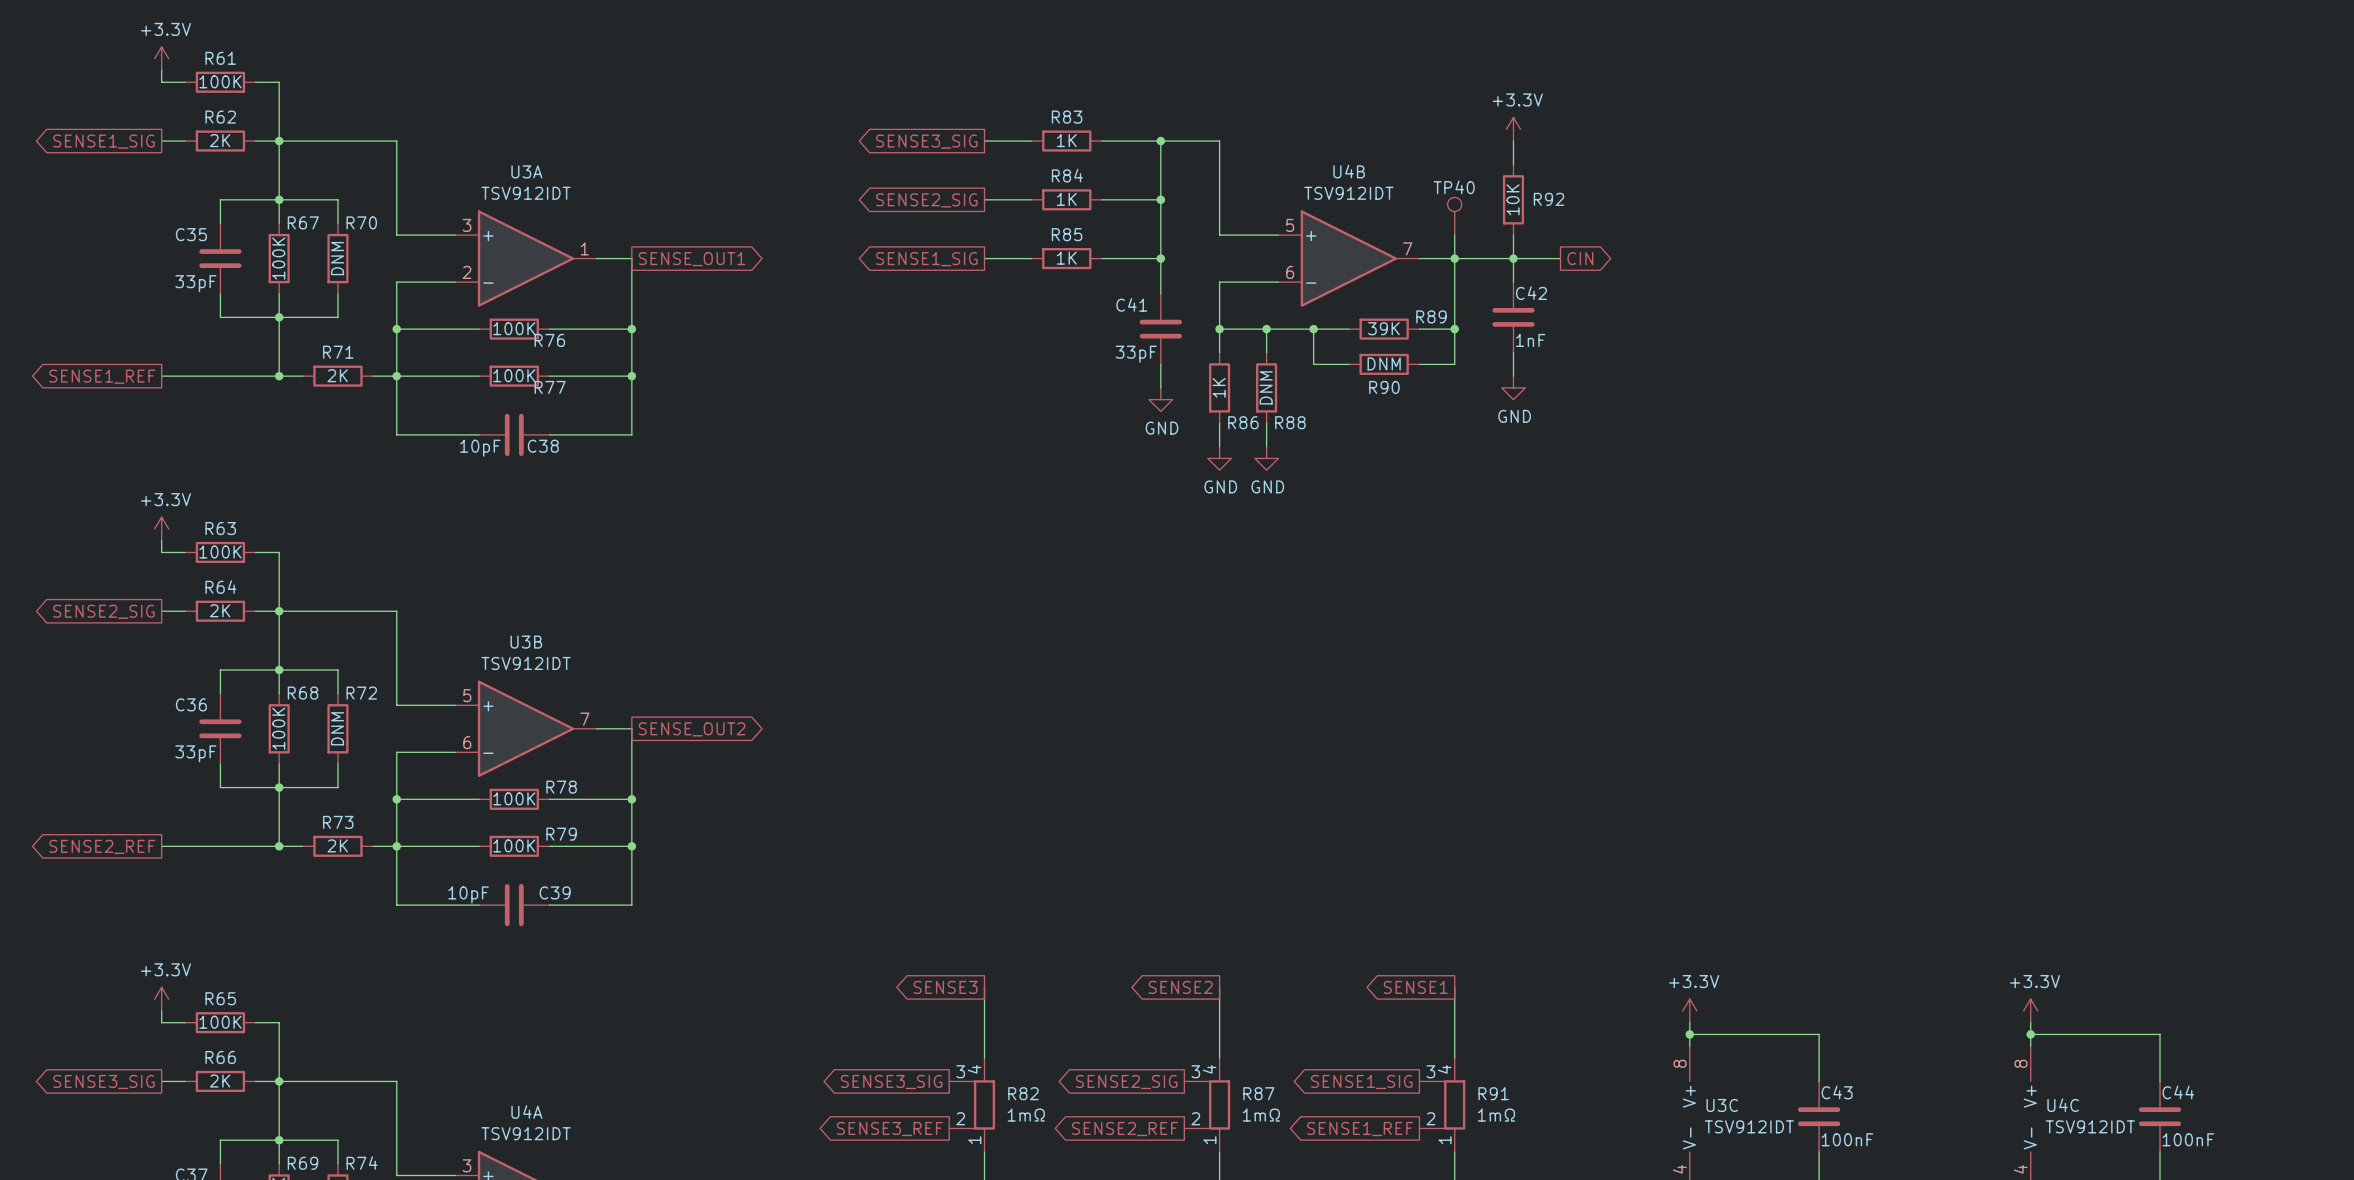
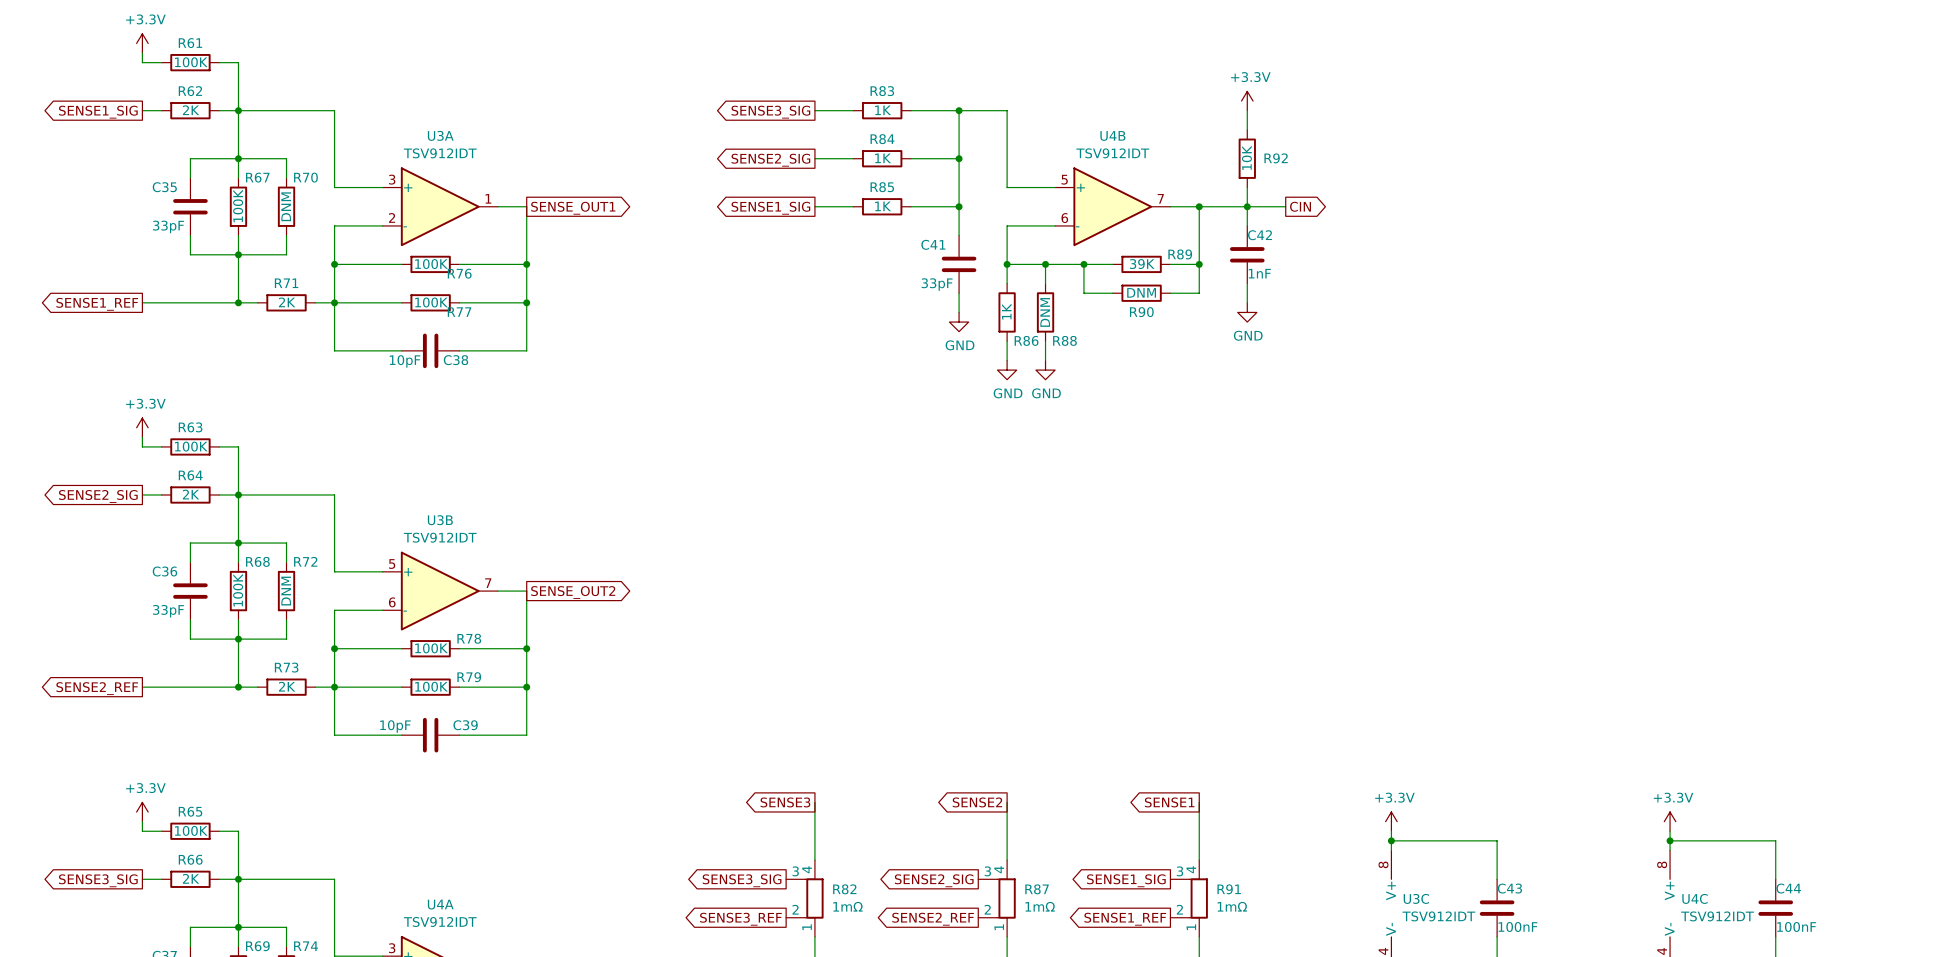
TP40: (1454, 216) -> none
wire: (1454, 235) (1454, 258) -> none

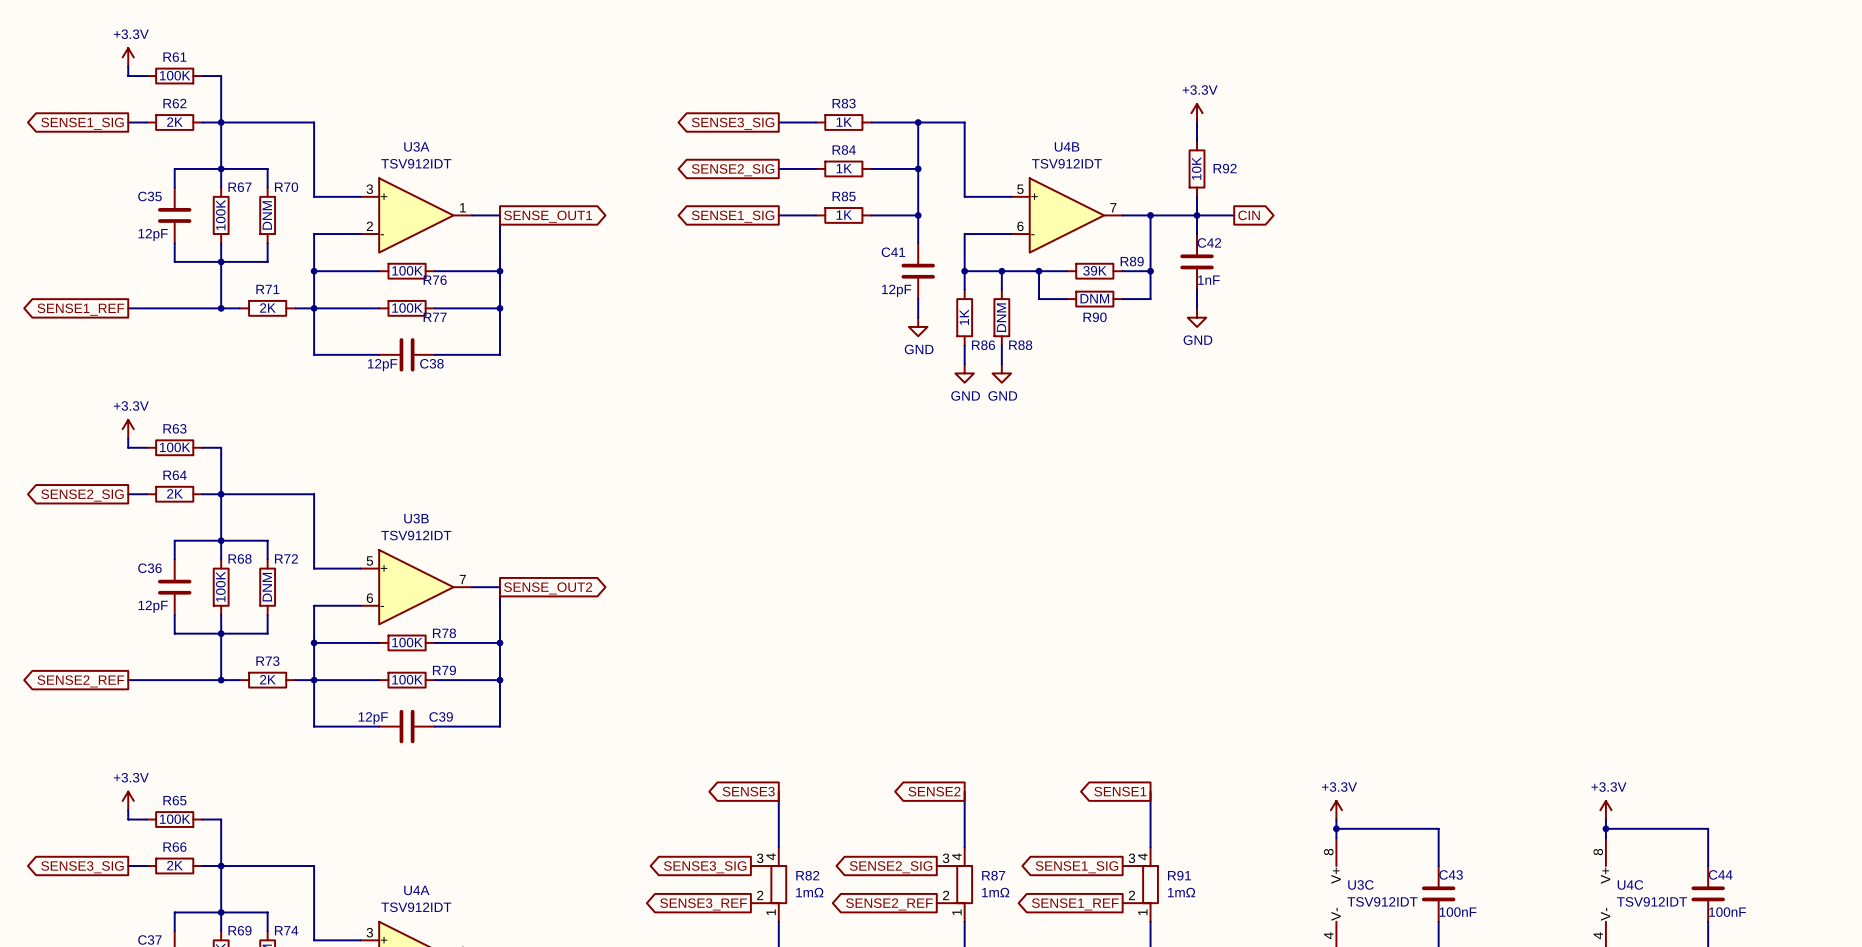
C35 value: 33pF (168, 226) -> 12pF (153, 235)
C41 value: 33pF (937, 284) -> 12pF (896, 290)
C38 value: 10pF (405, 361) -> 12pF (382, 365)
C36 value: 33pF (168, 611) -> 12pF (153, 606)
C39 value: 10pF (395, 726) -> 12pF (373, 718)

